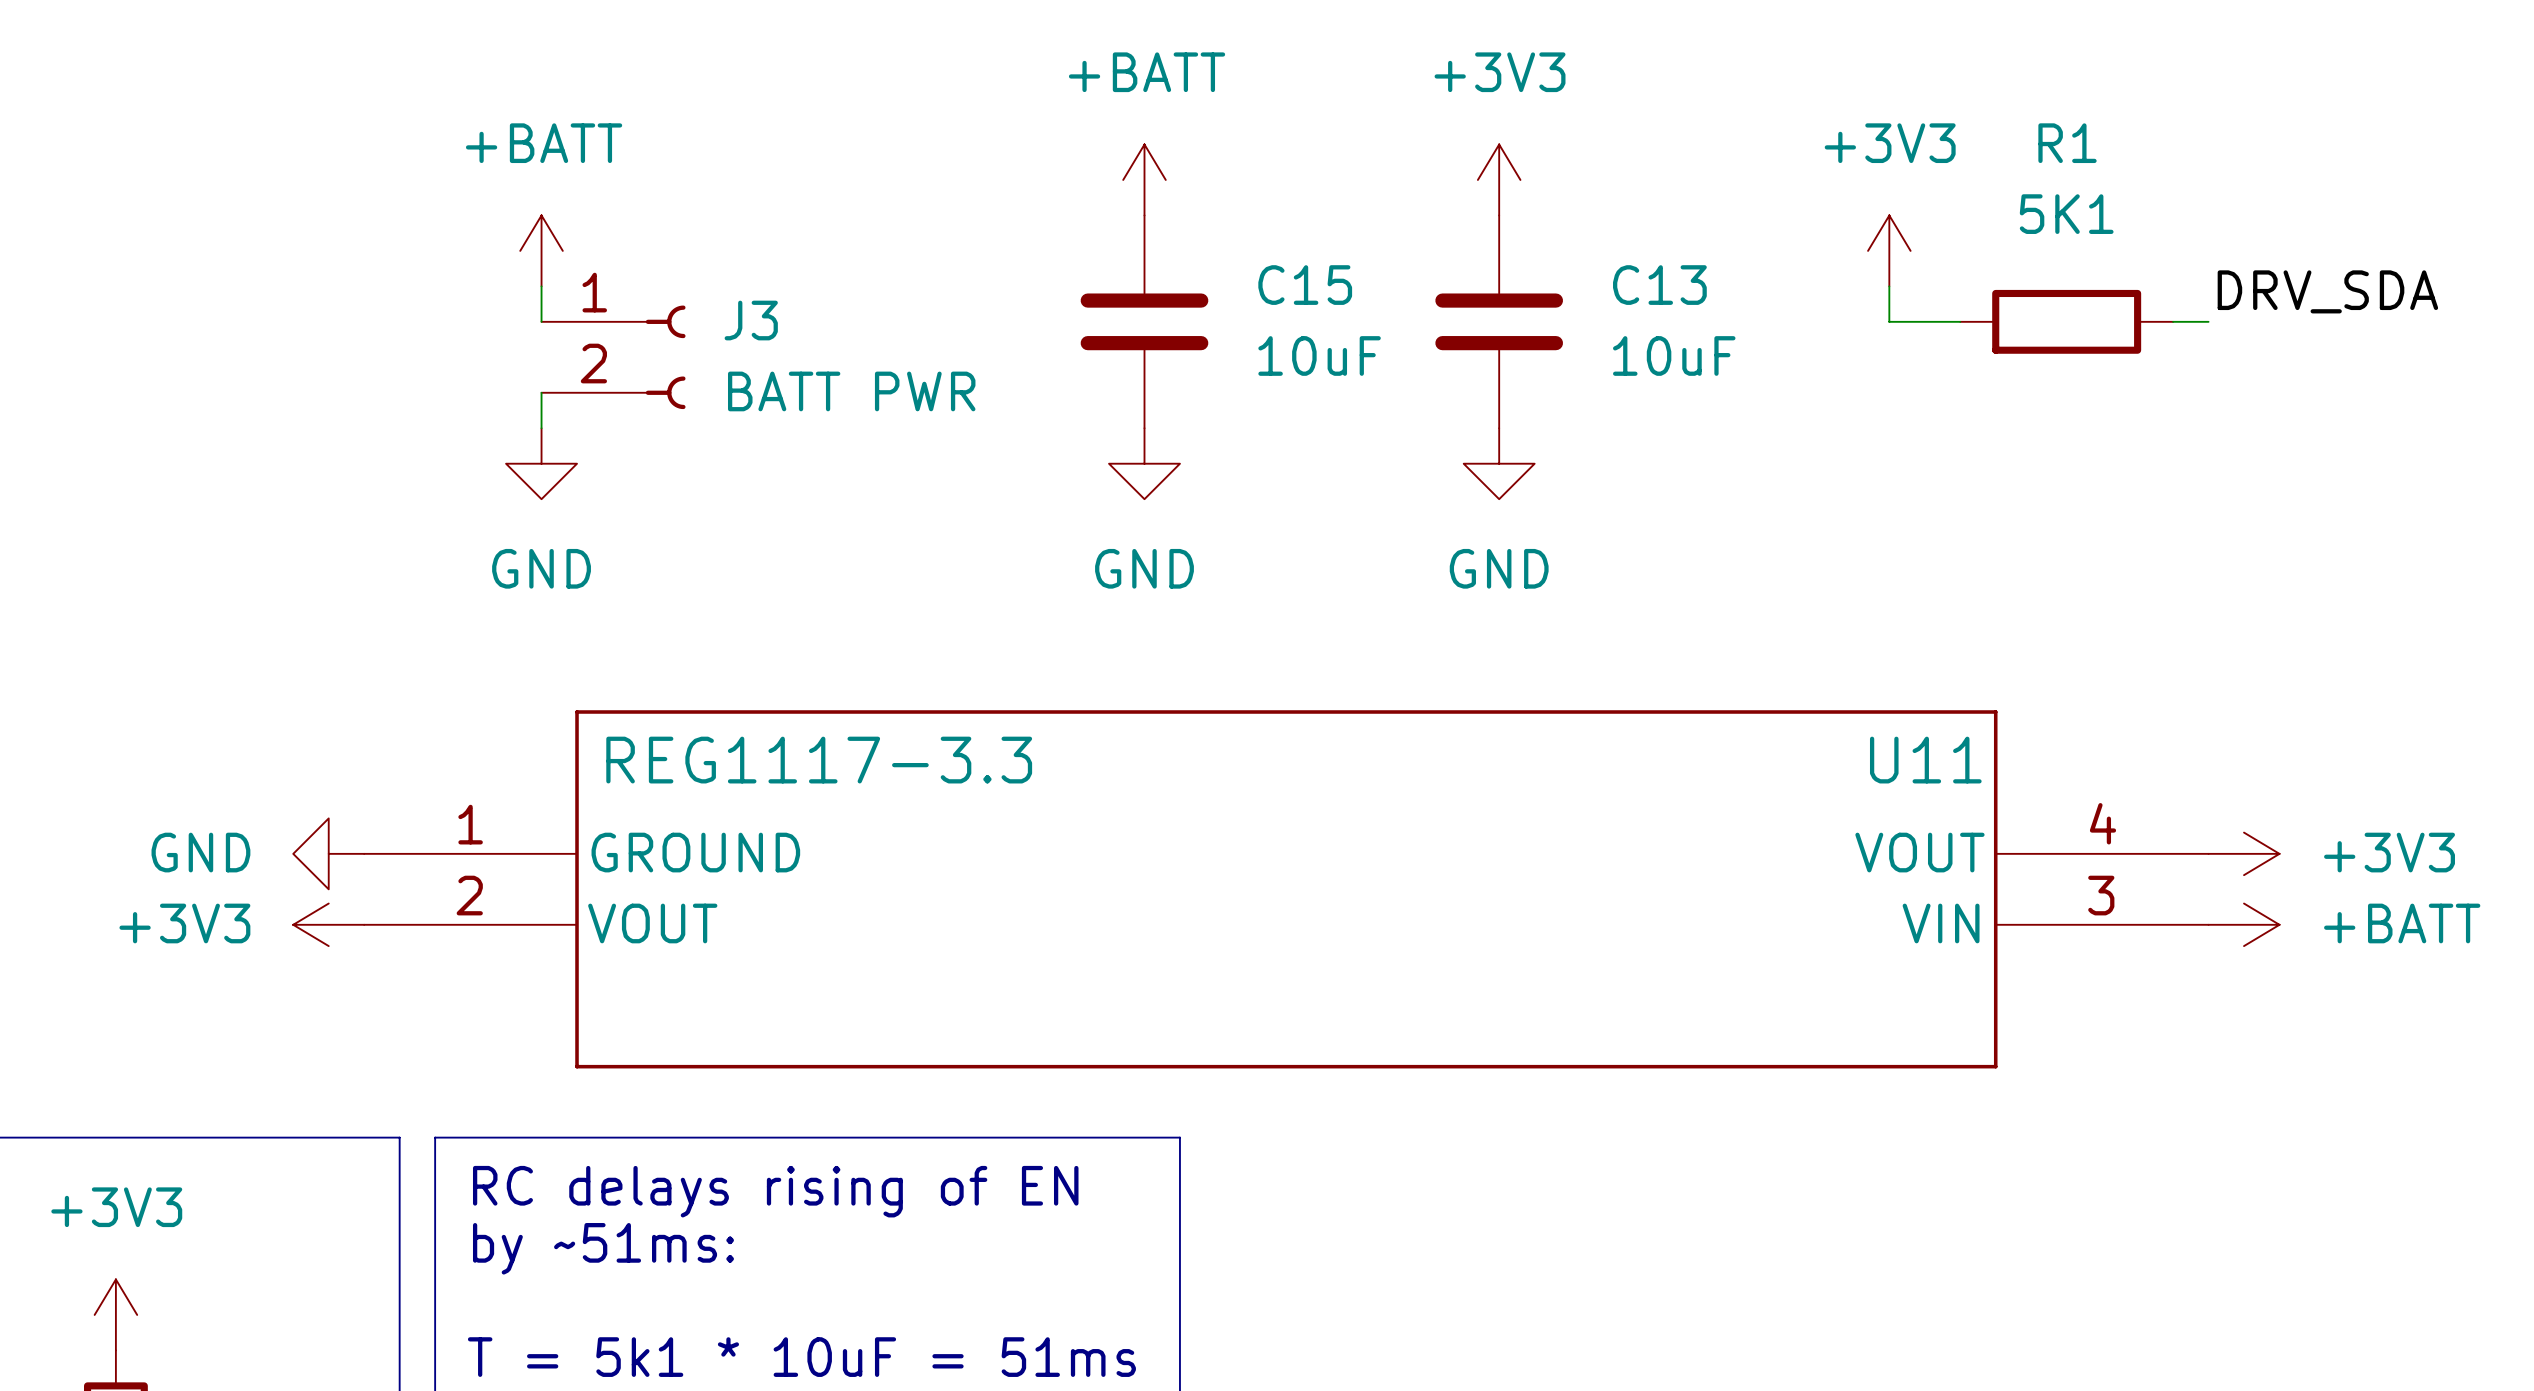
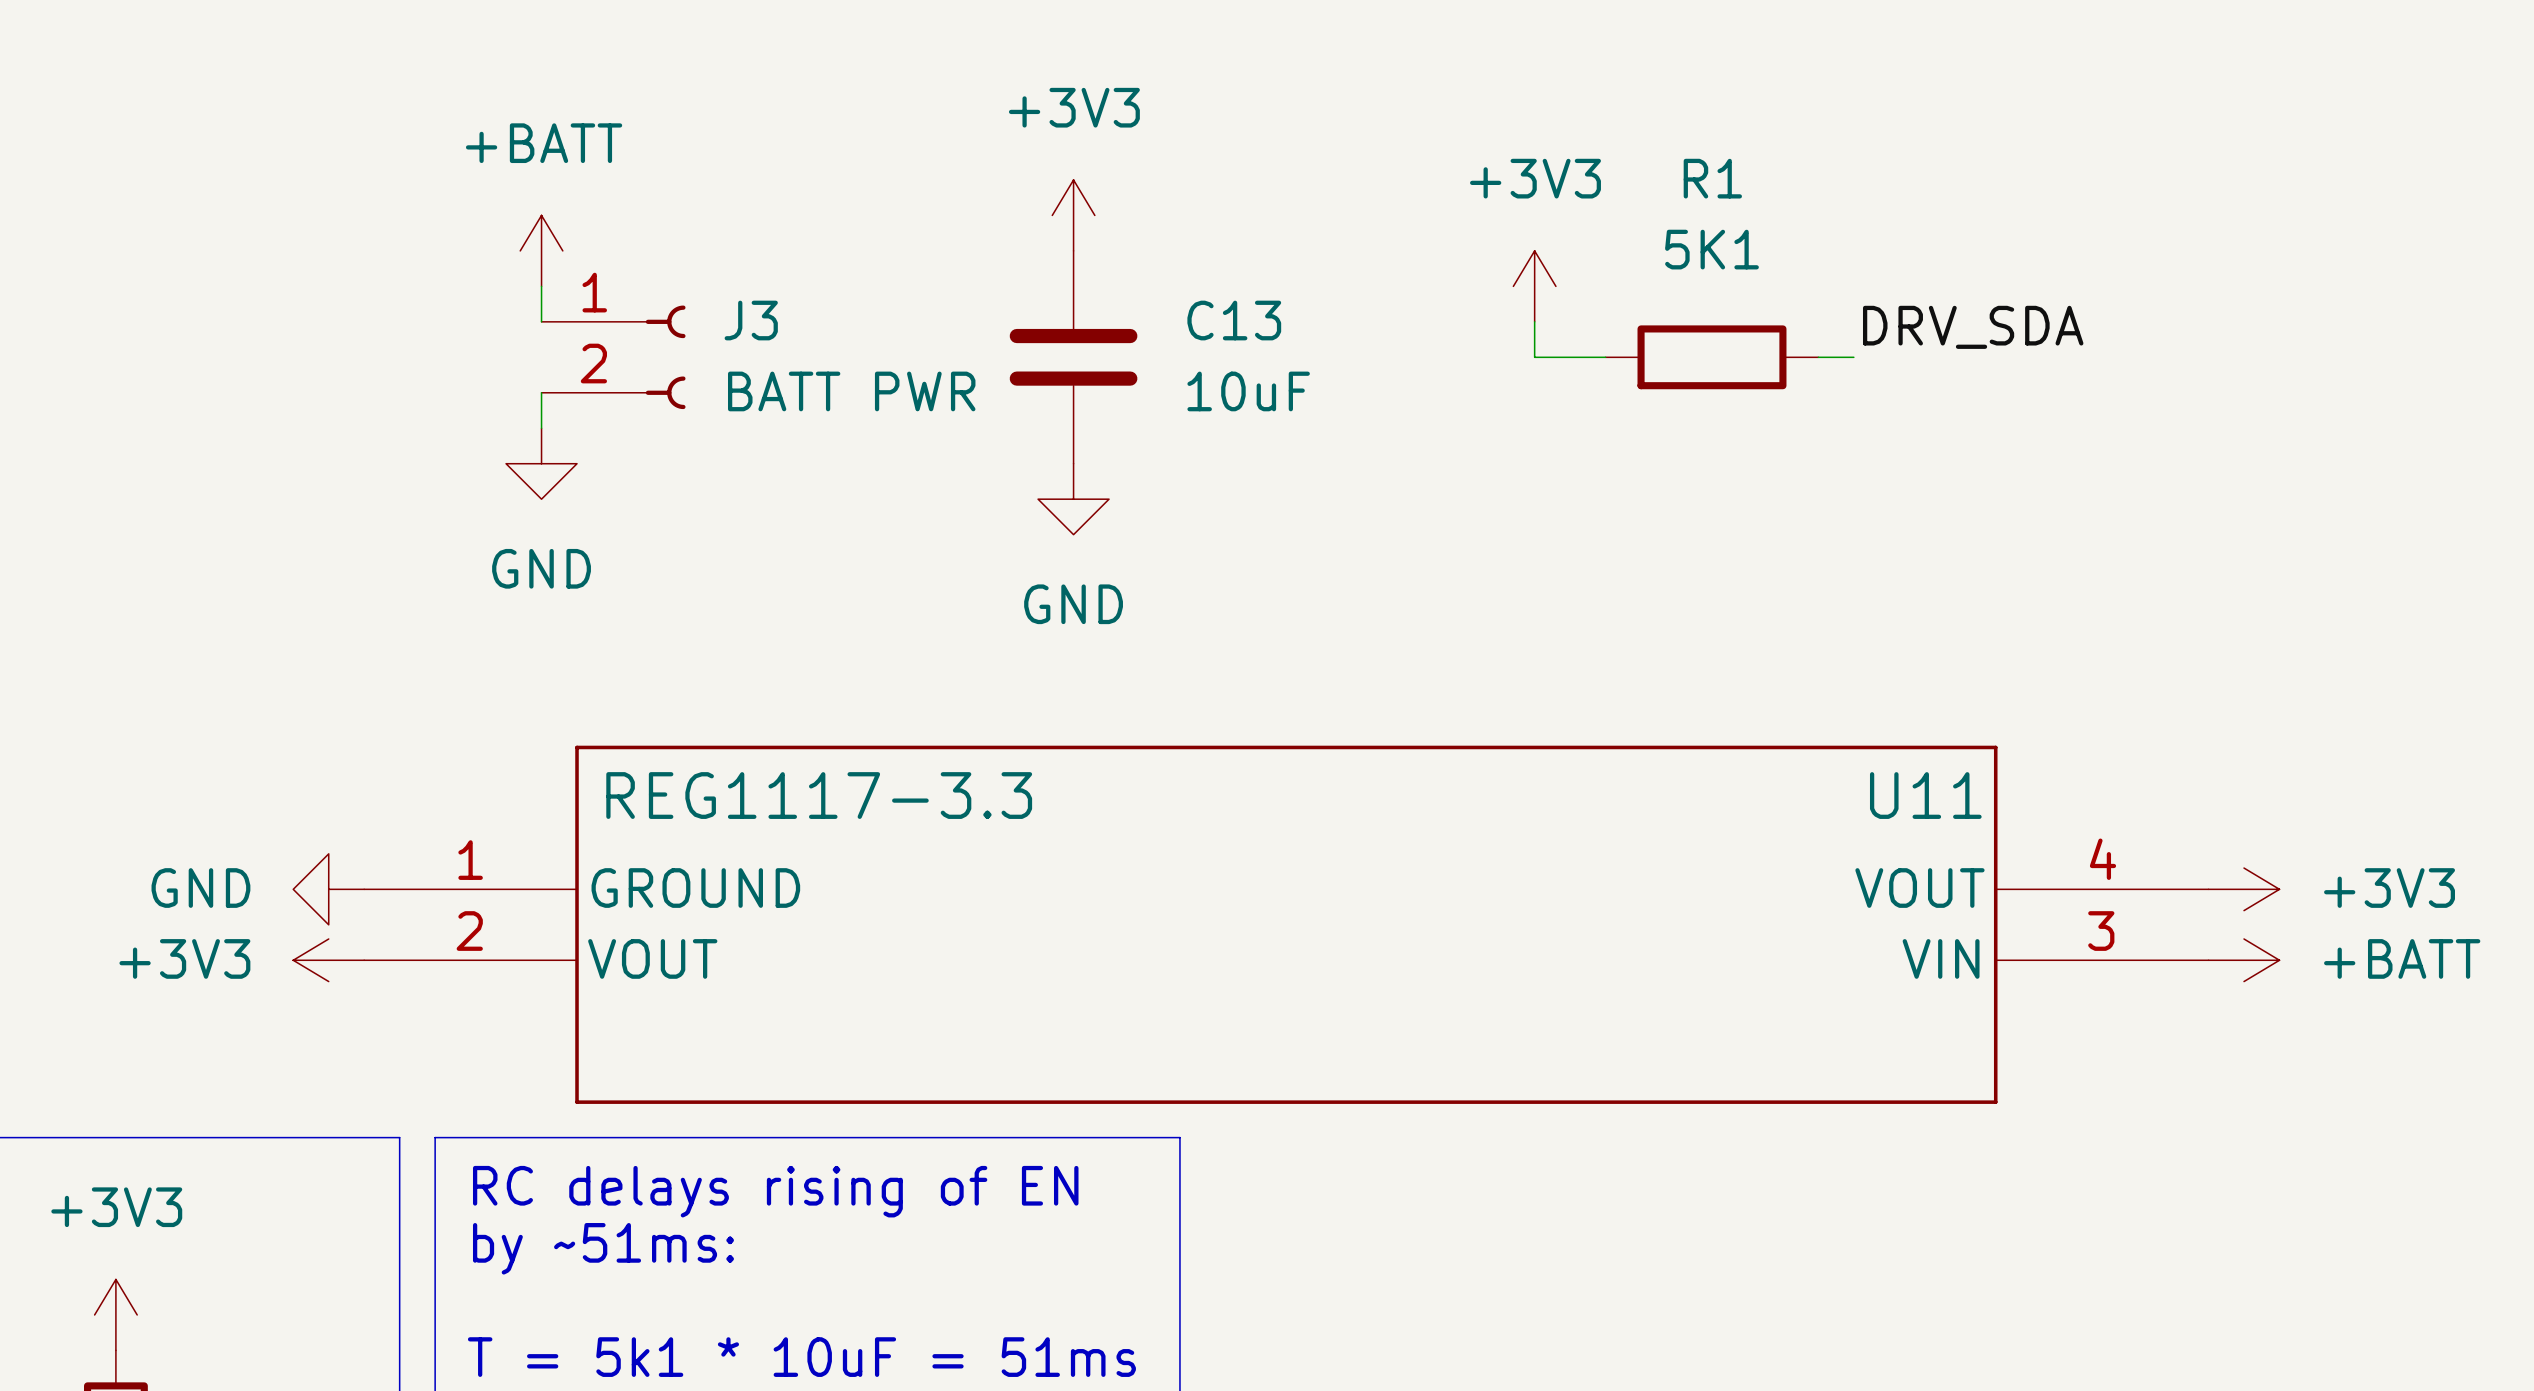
power symbol: +BATT (1144, 179) -> none
power symbol position: +3V3 (1499, 179) -> +3V3 (1534, 286)
power symbol: none -> +3V3 (1073, 215)
power symbol: +3V3 (1889, 250) -> none
wire: (1889, 286) (1889, 321) (1960, 321) -> (1534, 321) (1534, 357) (1605, 357)
label position: DRV_SDA (2327, 291) -> DRV_SDA (1973, 327)
C15: 10uF (1144, 321) -> none
C13 position: (1499, 321) -> (1073, 357)
R1 position: (2066, 321) -> (1711, 357)
wire: (2173, 321) (2208, 321) -> (1818, 357) (1853, 357)
power symbol position: GND (1144, 463) -> GND (1073, 499)
power symbol: GND (1499, 463) -> none
power symbol position: GND (328, 853) -> GND (328, 889)
power symbol position: +3V3 (2244, 853) -> +3V3 (2244, 889)
U11 position: (1286, 889) -> (1286, 924)
power symbol position: +3V3 (328, 924) -> +3V3 (328, 960)
power symbol position: +BATT (2244, 924) -> +BATT (2244, 960)

